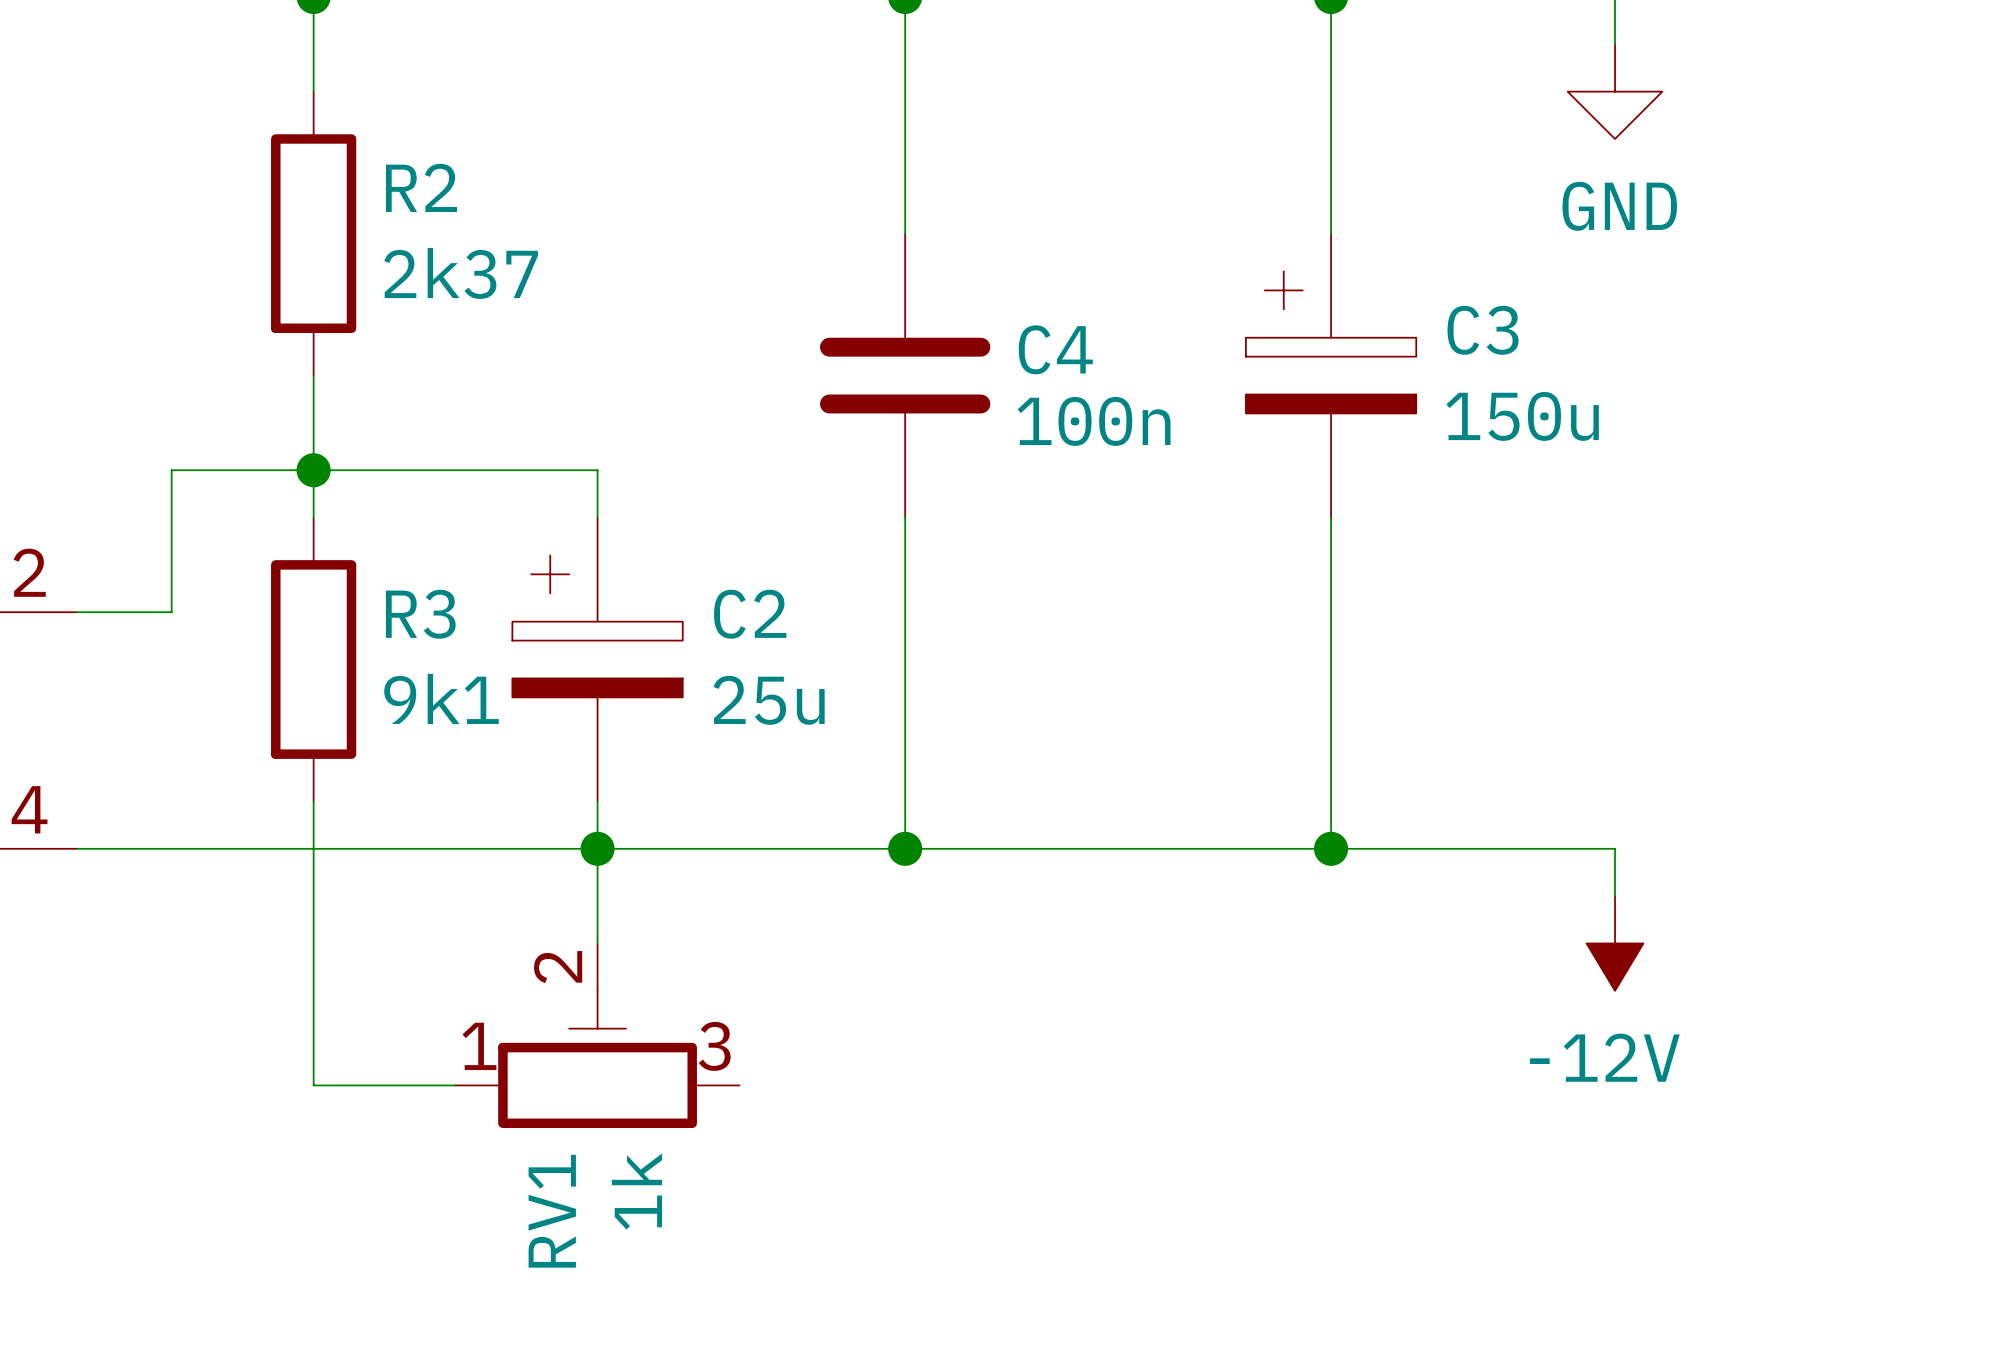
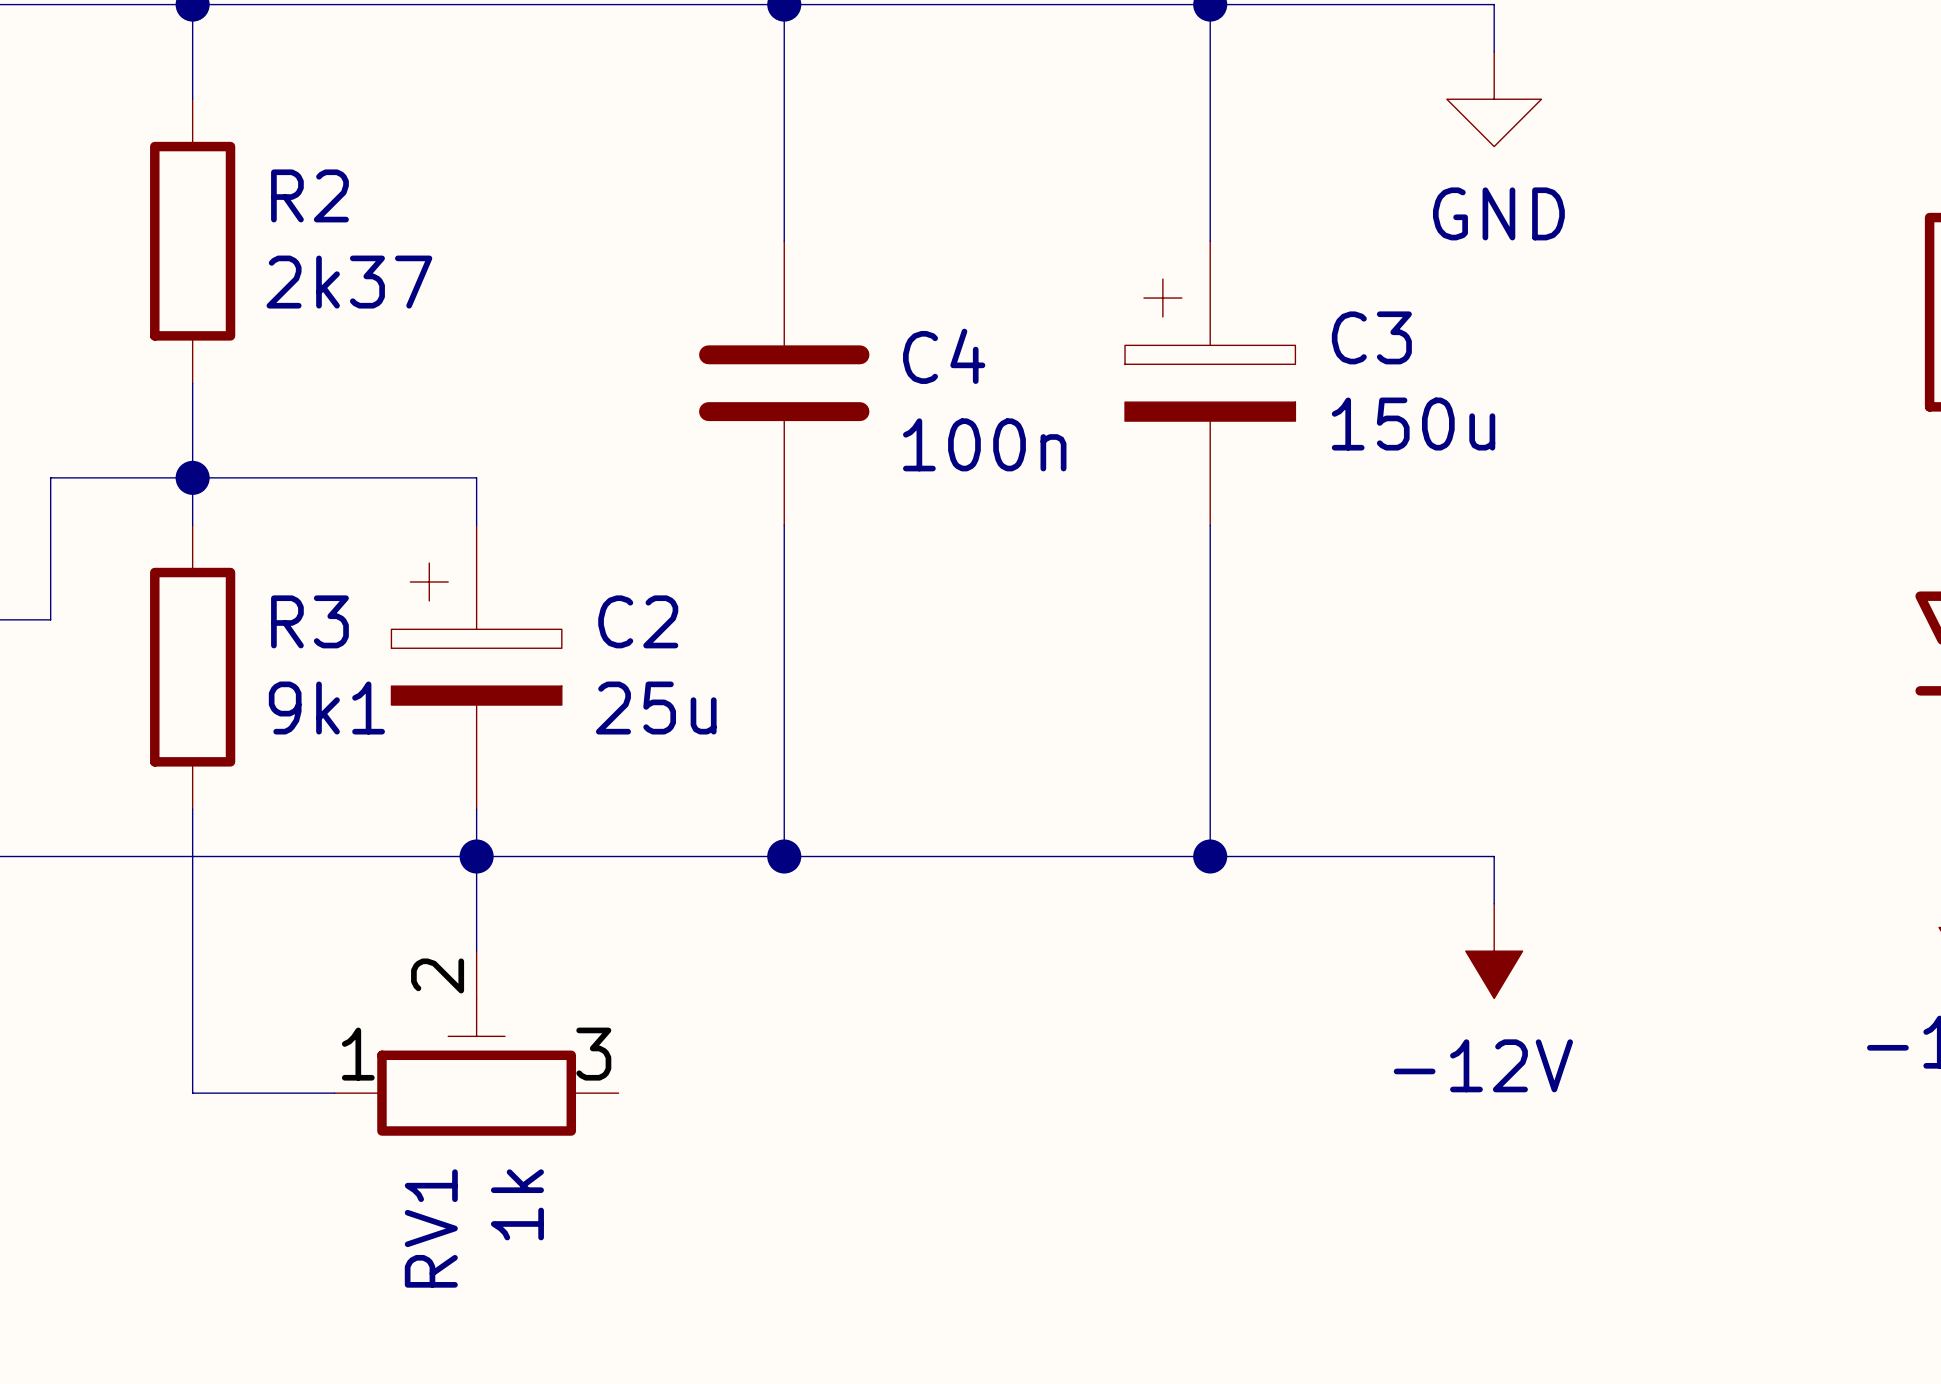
C4 value position: 100n (1094, 421) -> 100n (984, 444)

